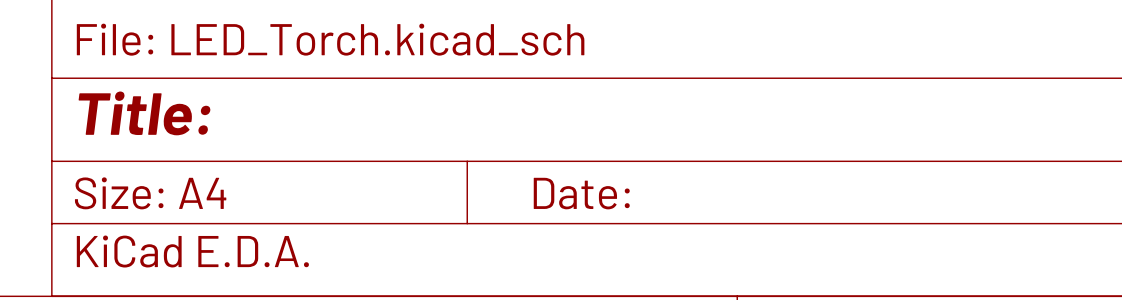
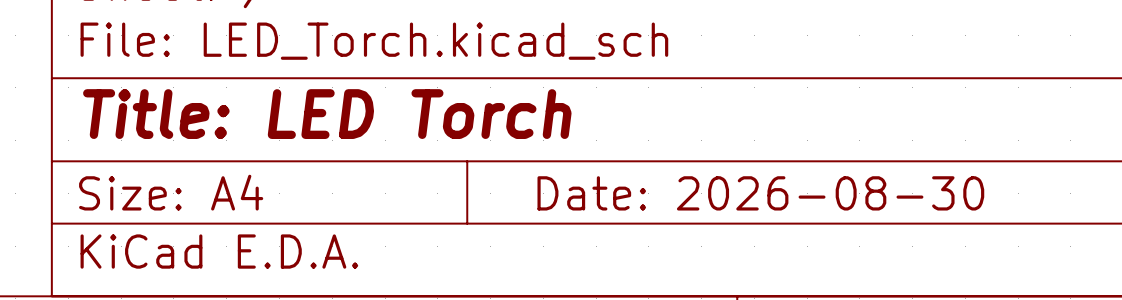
title block: Title: (144, 113) -> Title: LED Torch (327, 114)
title block: Date: (581, 193) -> Date: 2026-08-30 (760, 193)

